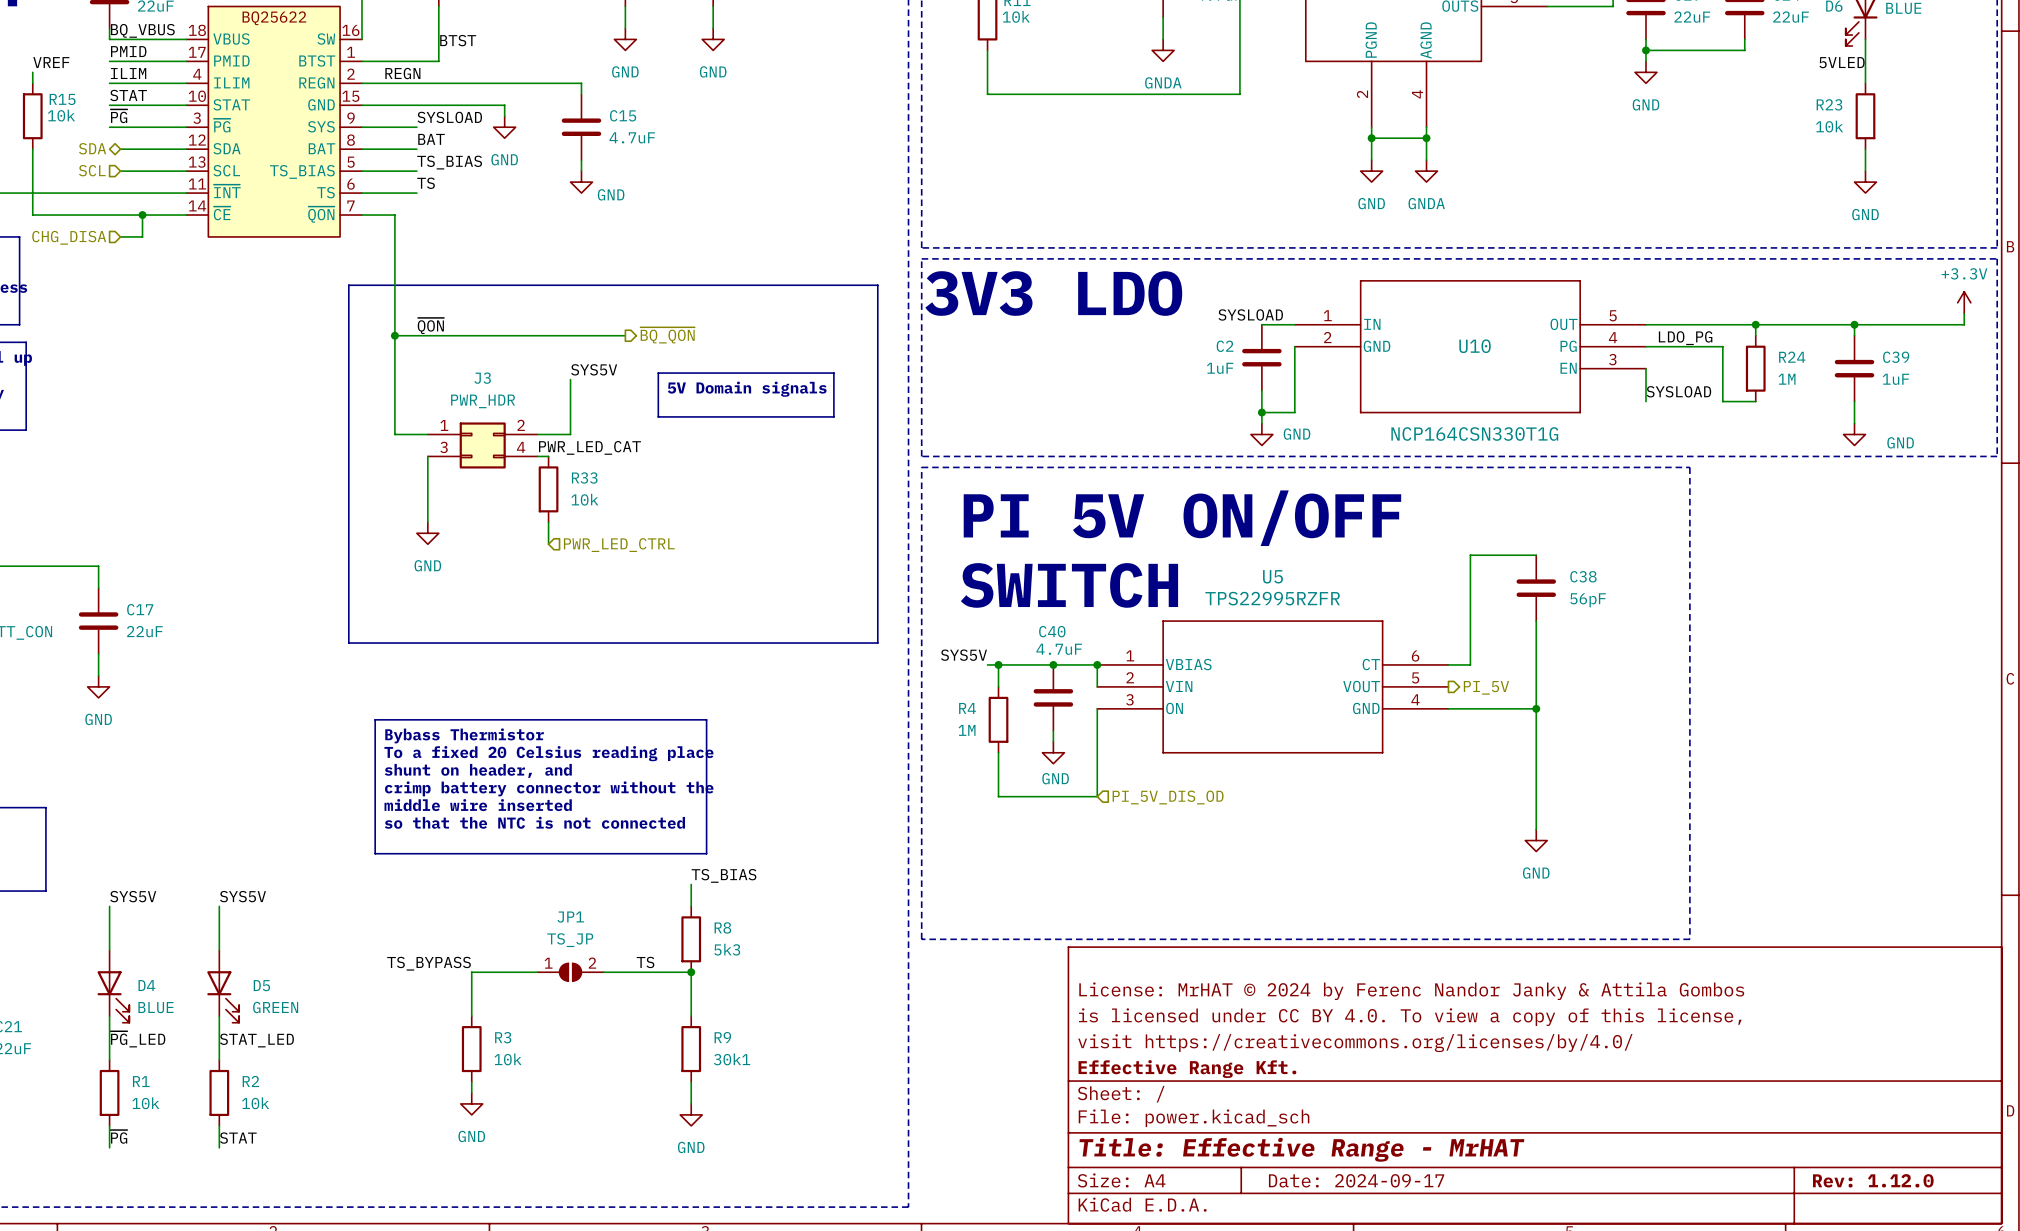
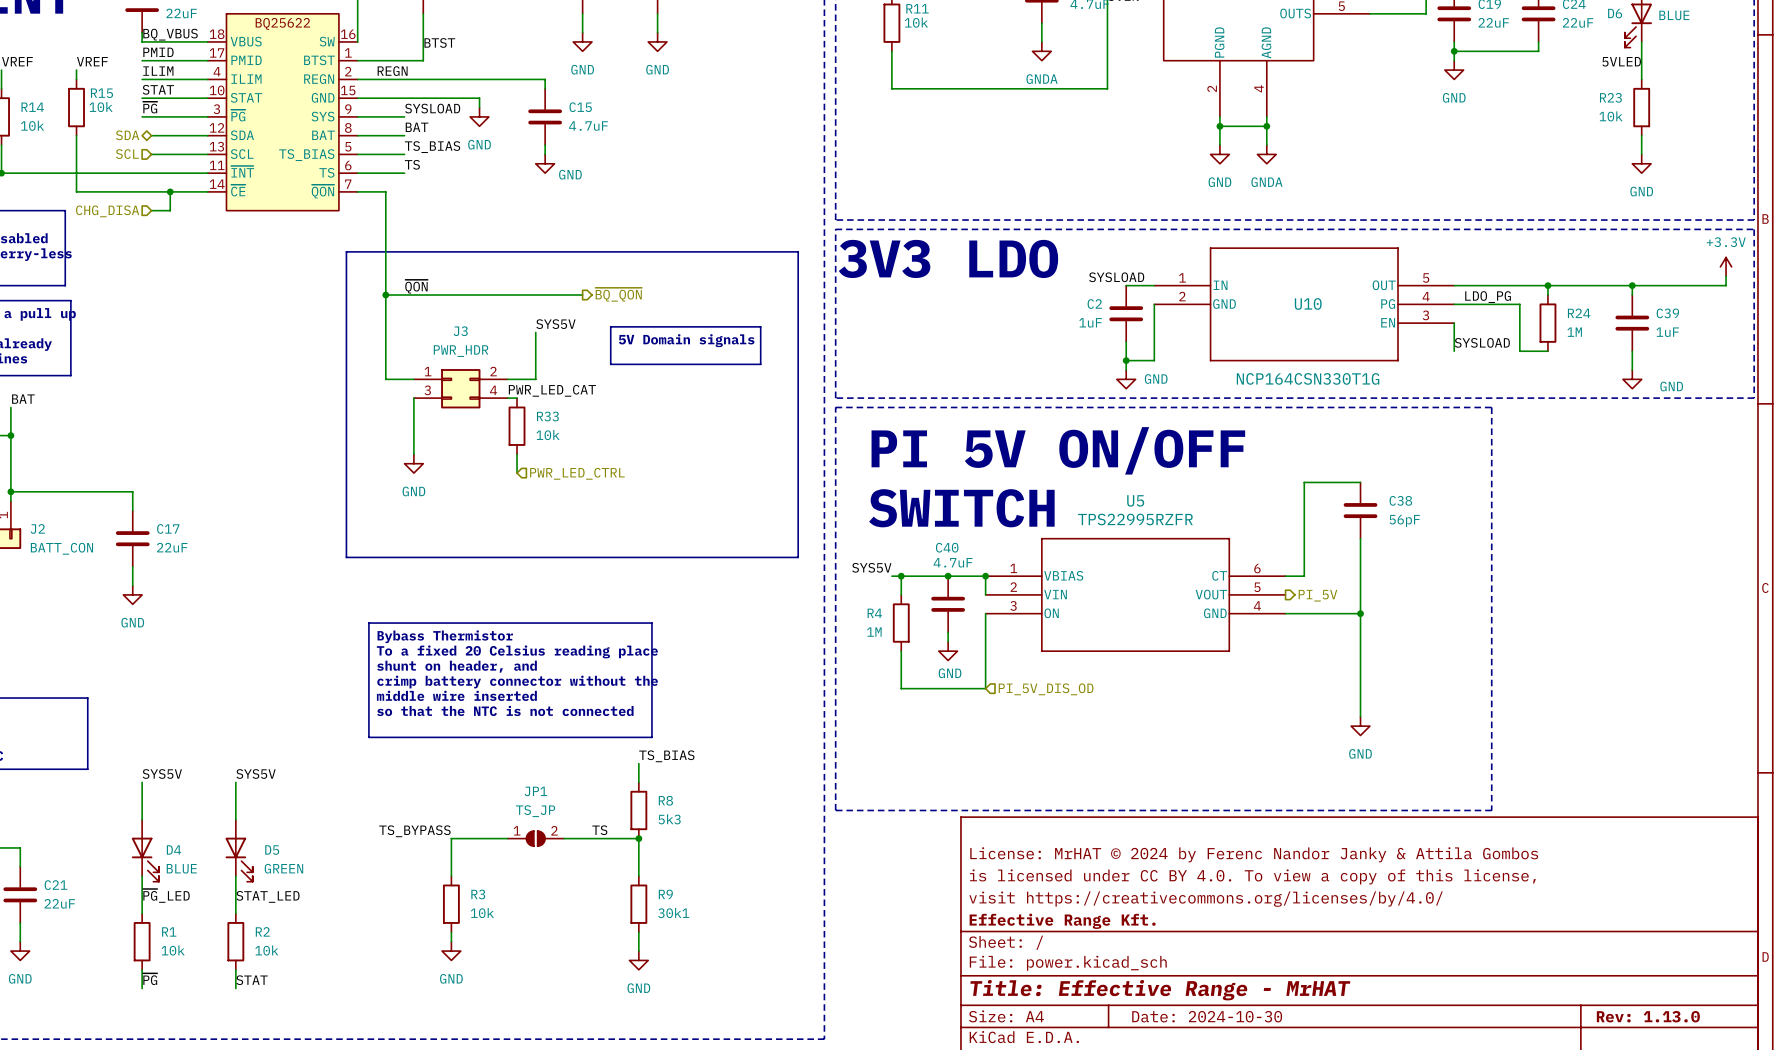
title block: Date: 2024-09-17 (1356, 1180) -> Date: 2024-10-30 (1207, 1016)
title block: Rev: 1.12.0 (1873, 1180) -> Rev: 1.13.0 (1648, 1016)

